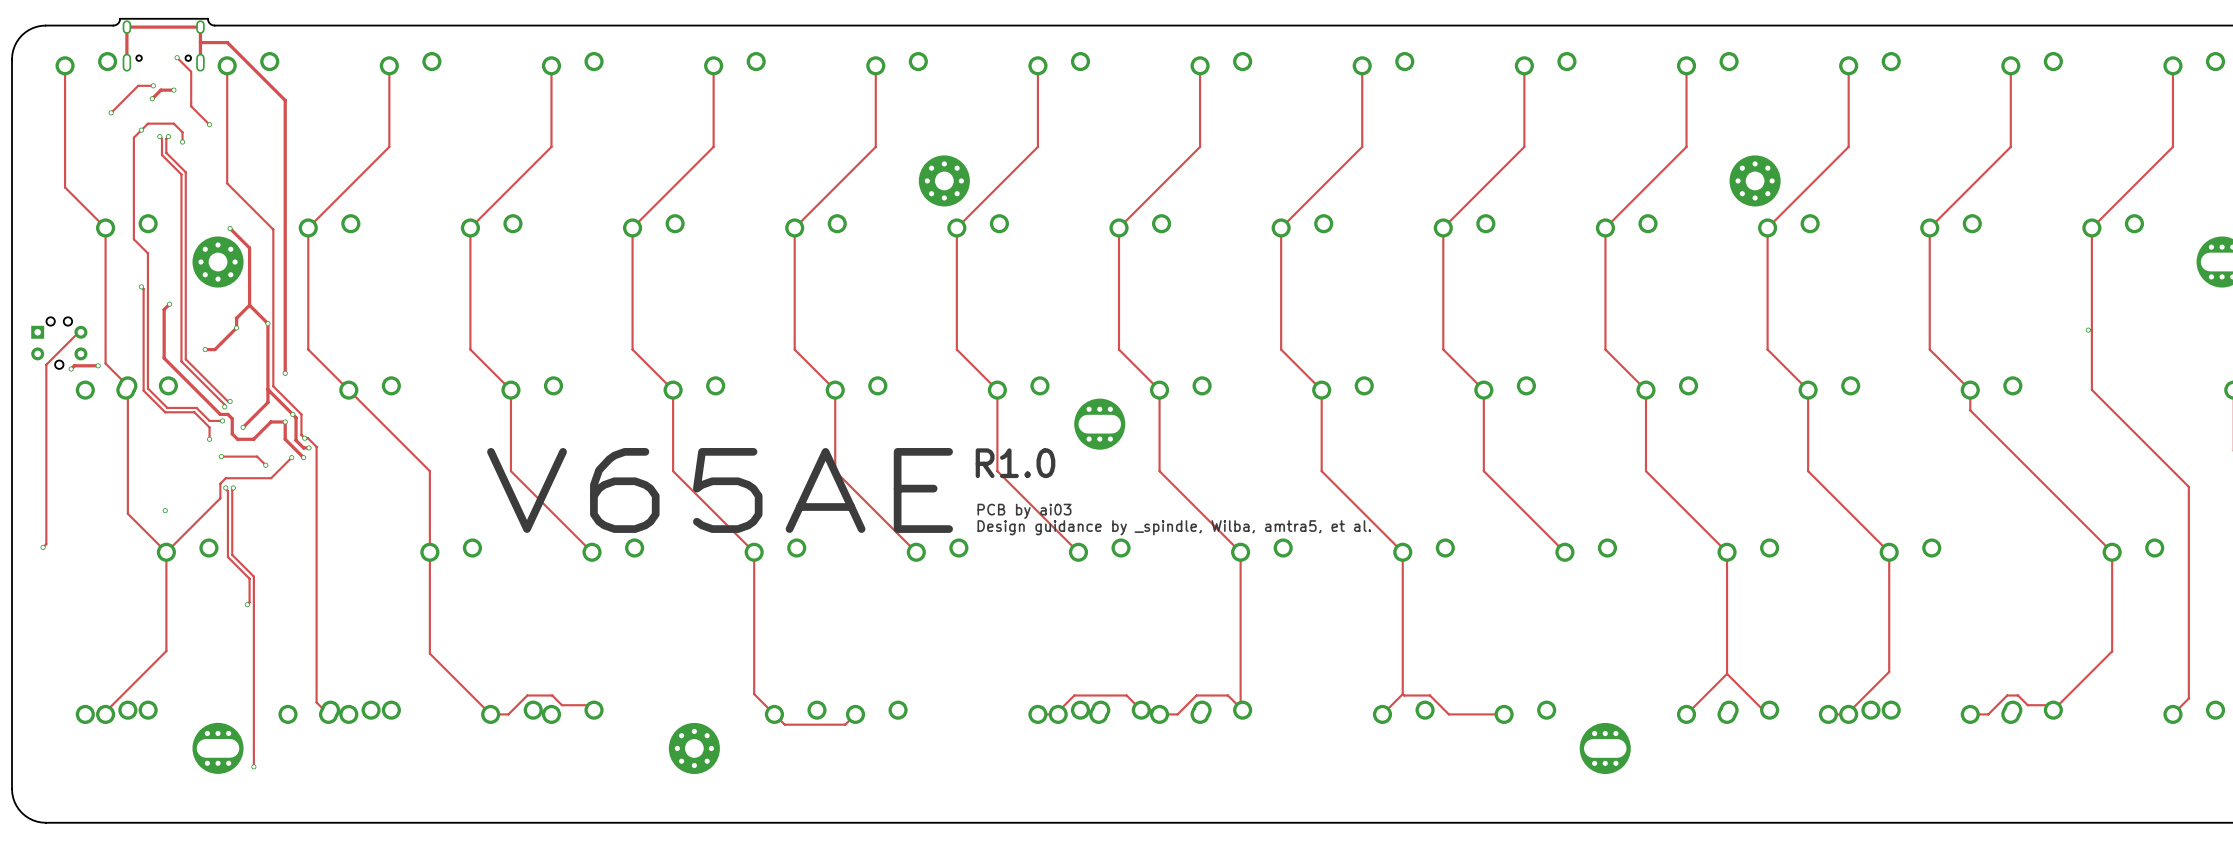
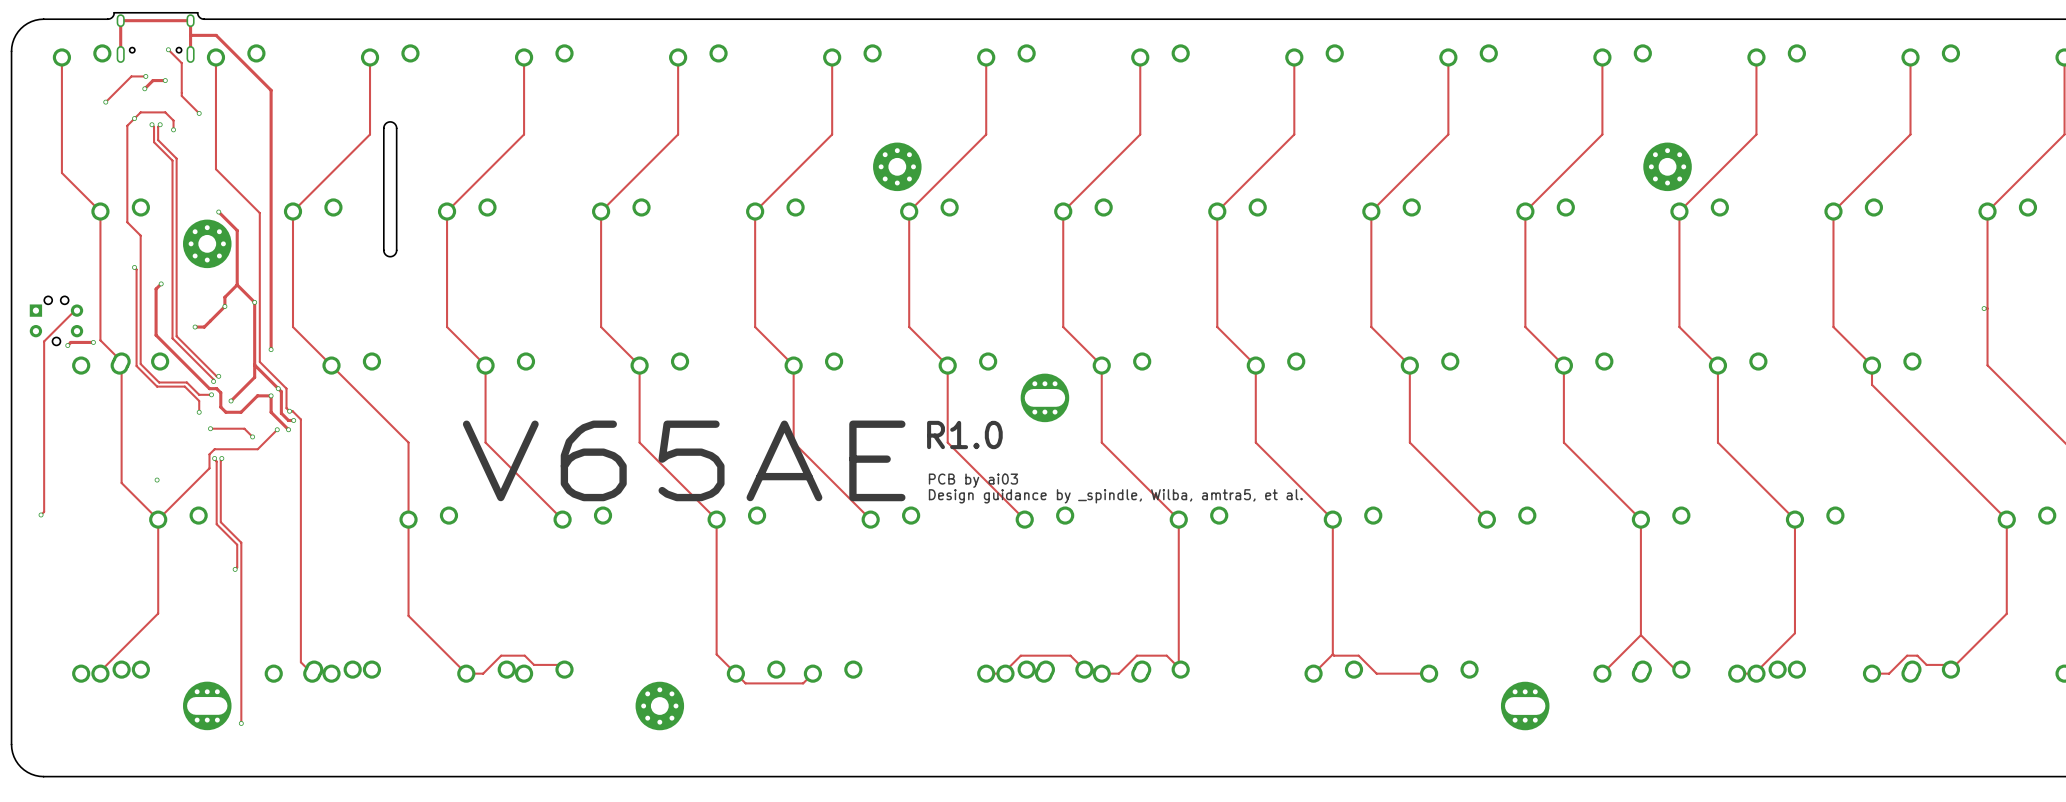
board edge: none -> (383, 128) (383, 250) (385, 254) (390, 256) (394, 254) (396, 250) (396, 128) (394, 123) (390, 121) (385, 123) (383, 128)

